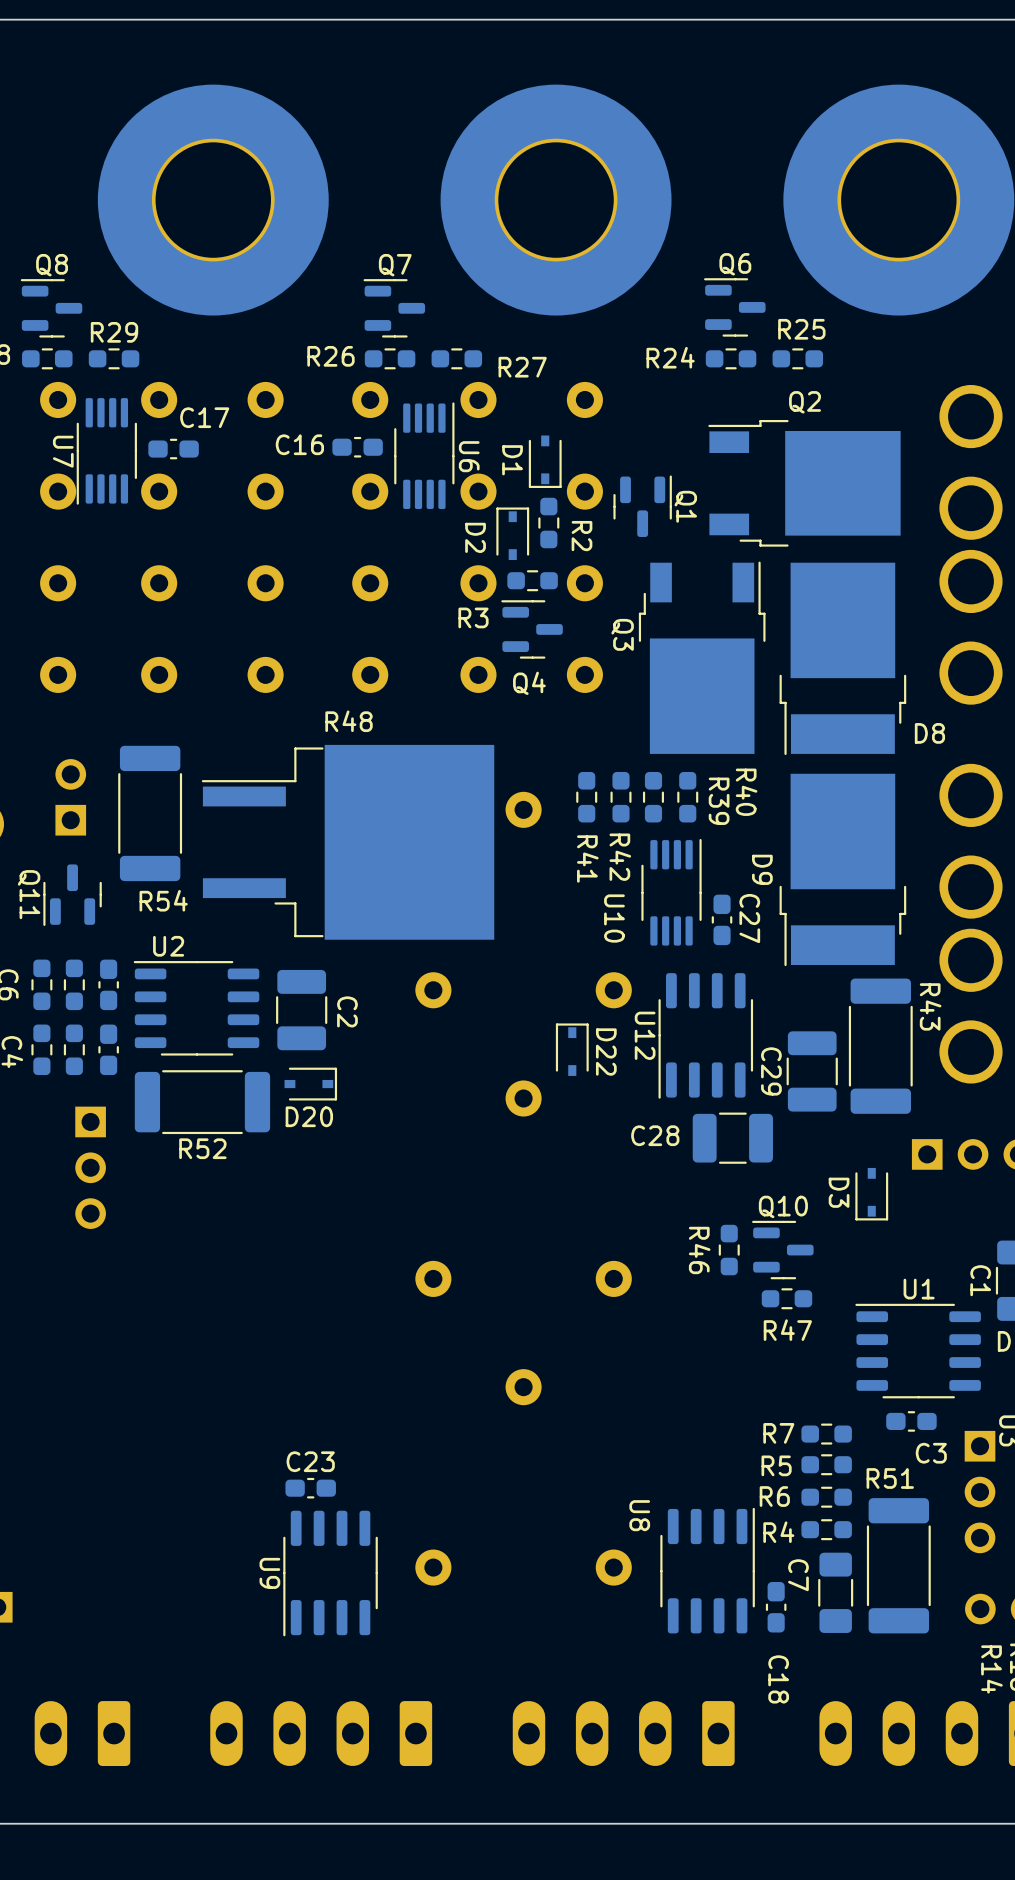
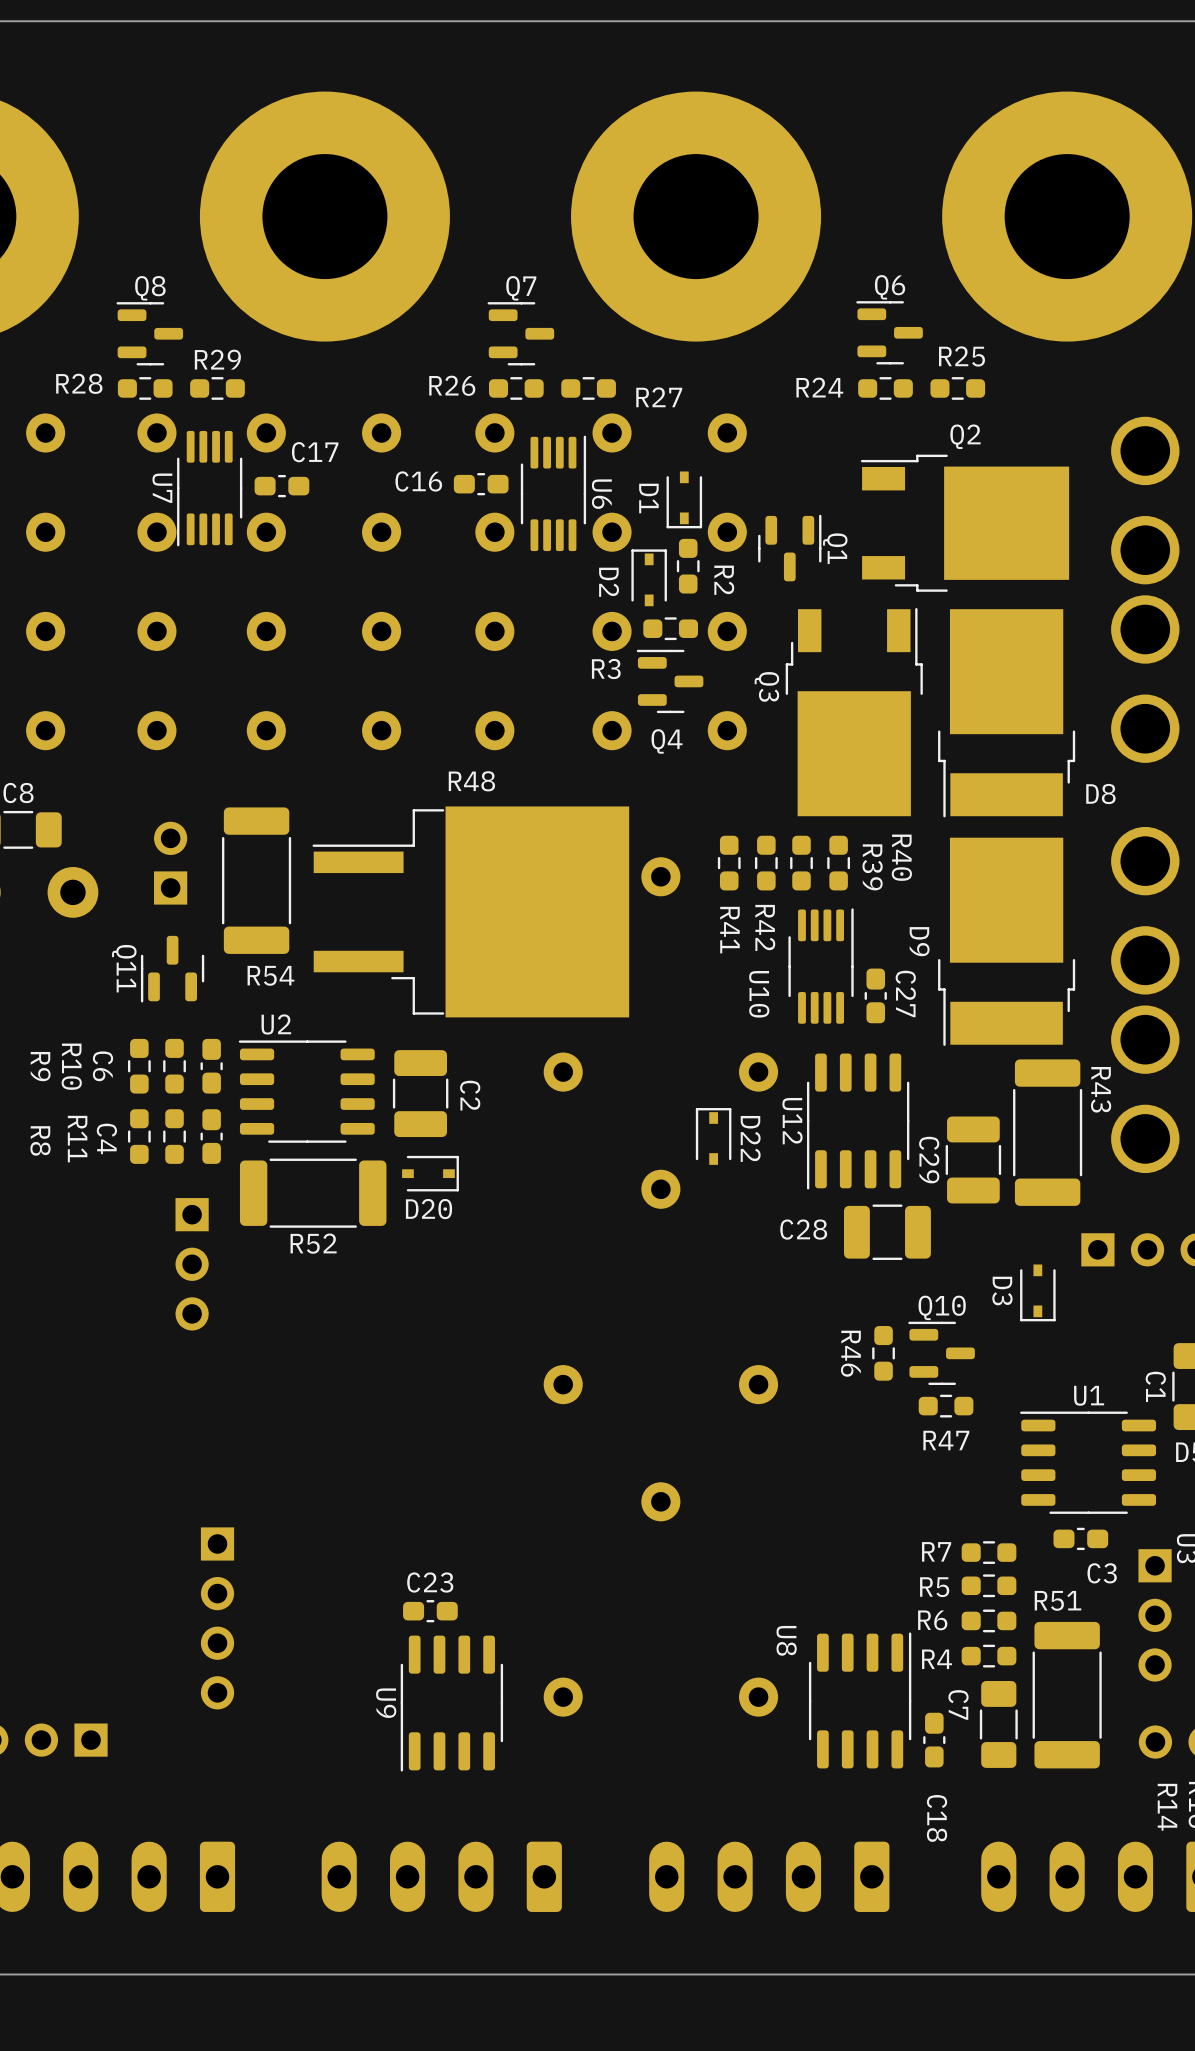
part: none -> (217, 1618)

